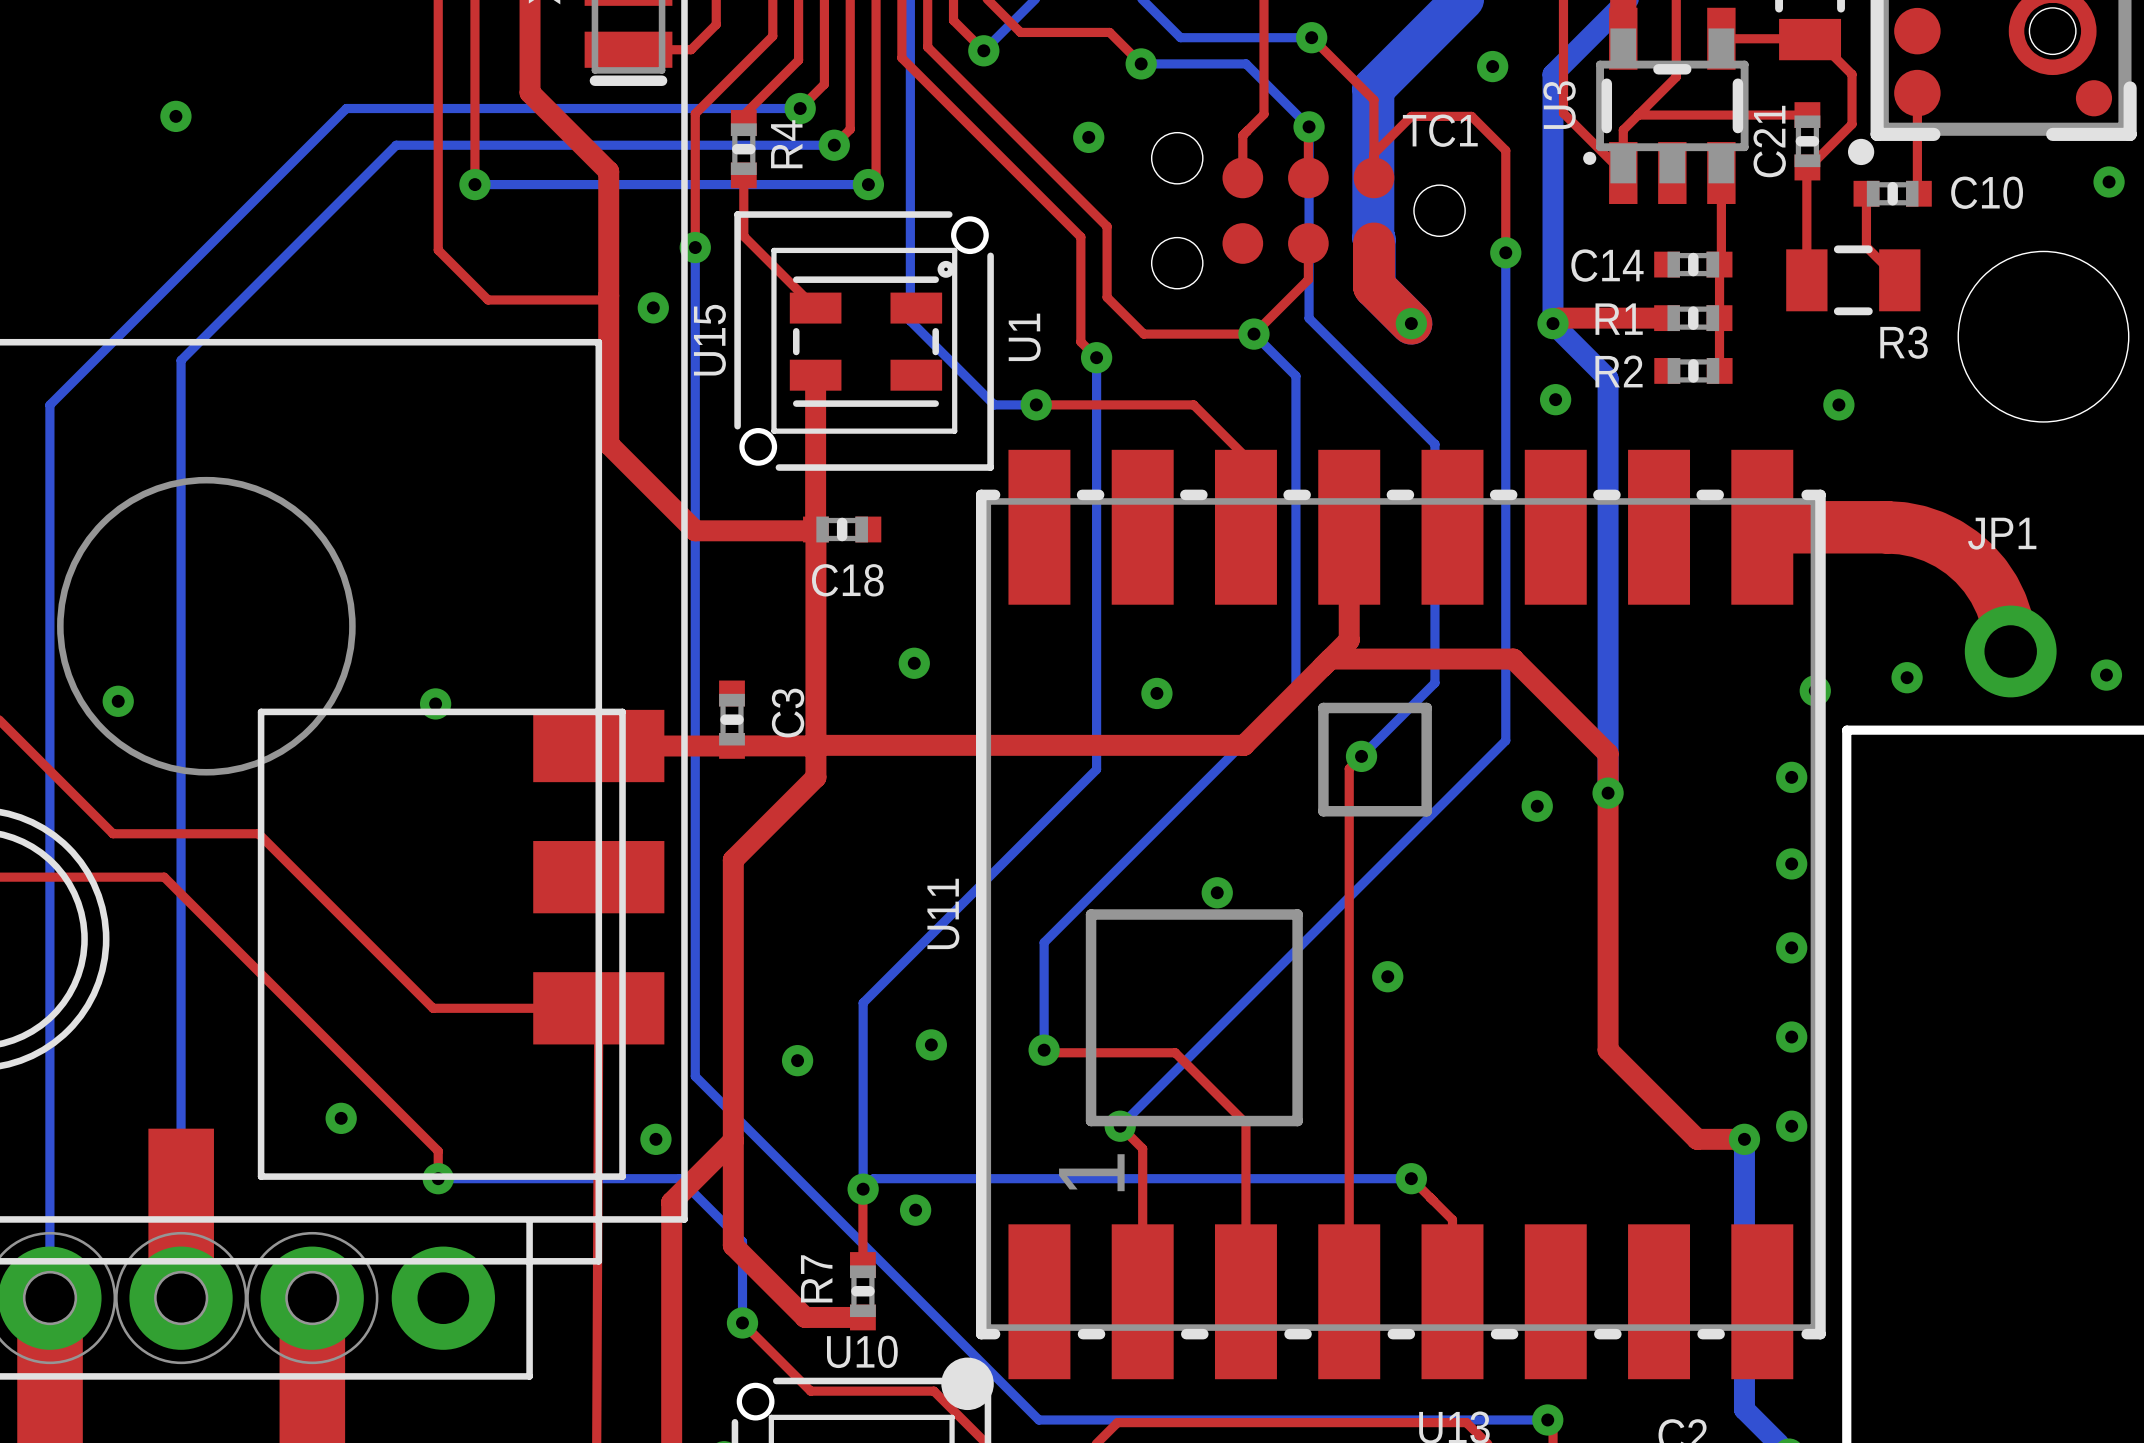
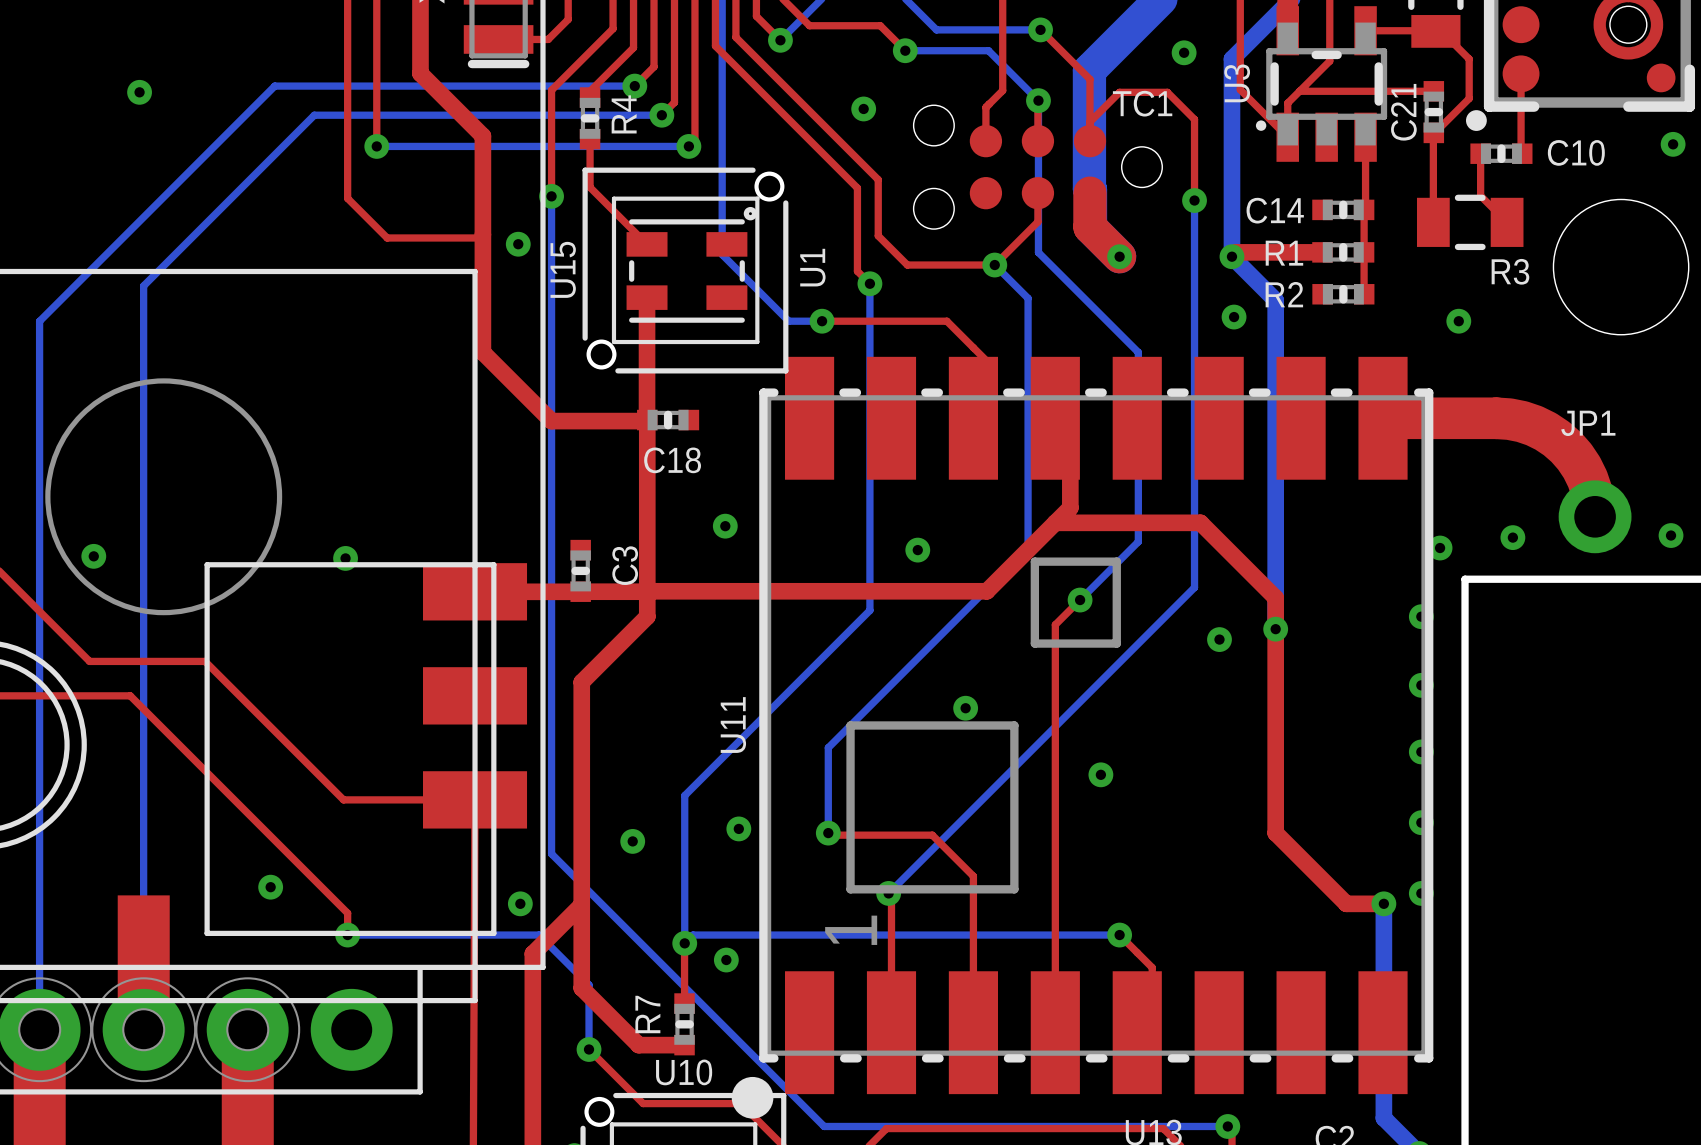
top track: (1349, 768) (1349, 1301) -> (1070, 609) (1055, 624) (1055, 1032)
U11 position: (1383, 929) -> (1082, 737)
top track: (1227, 1104) (1245, 1123) (1245, 1301) -> (973, 876) (973, 1032)
top track: (1123, 1129) (1142, 1148) (1142, 1301) -> (891, 896) (891, 1032)

